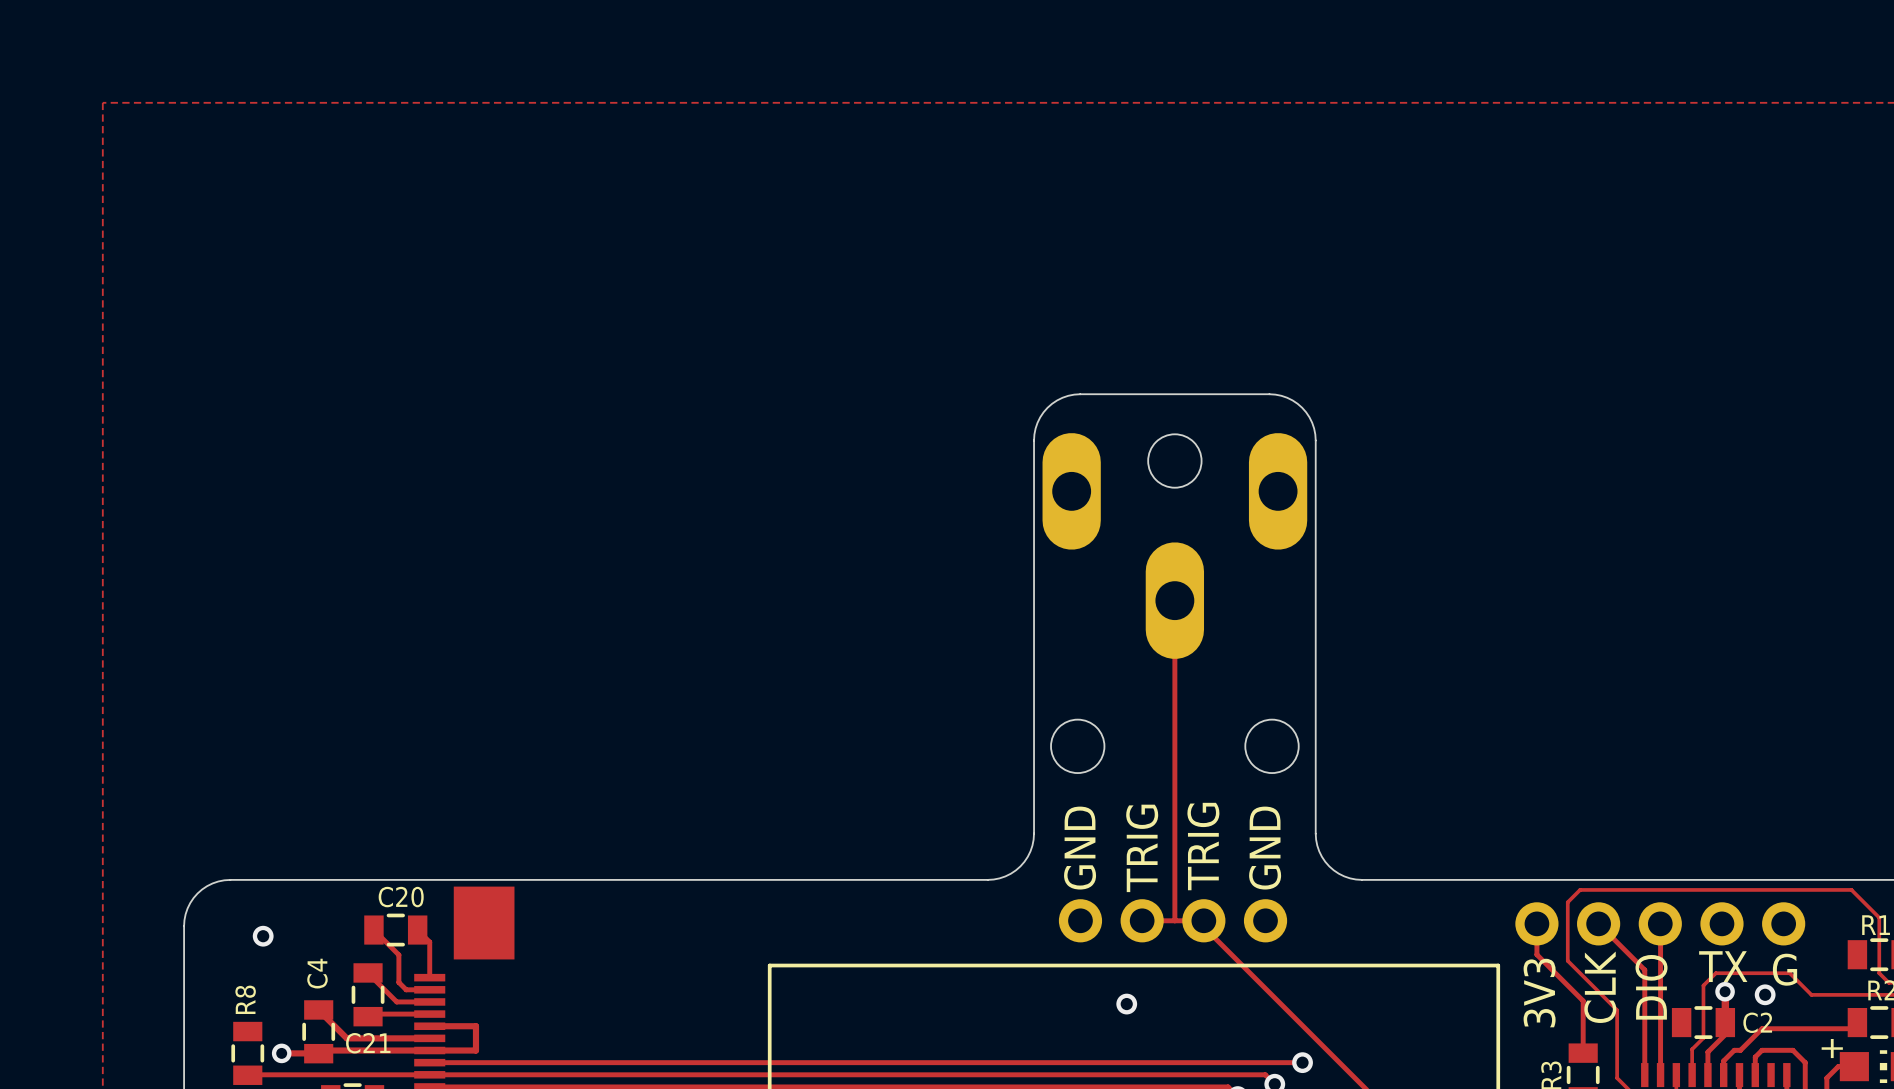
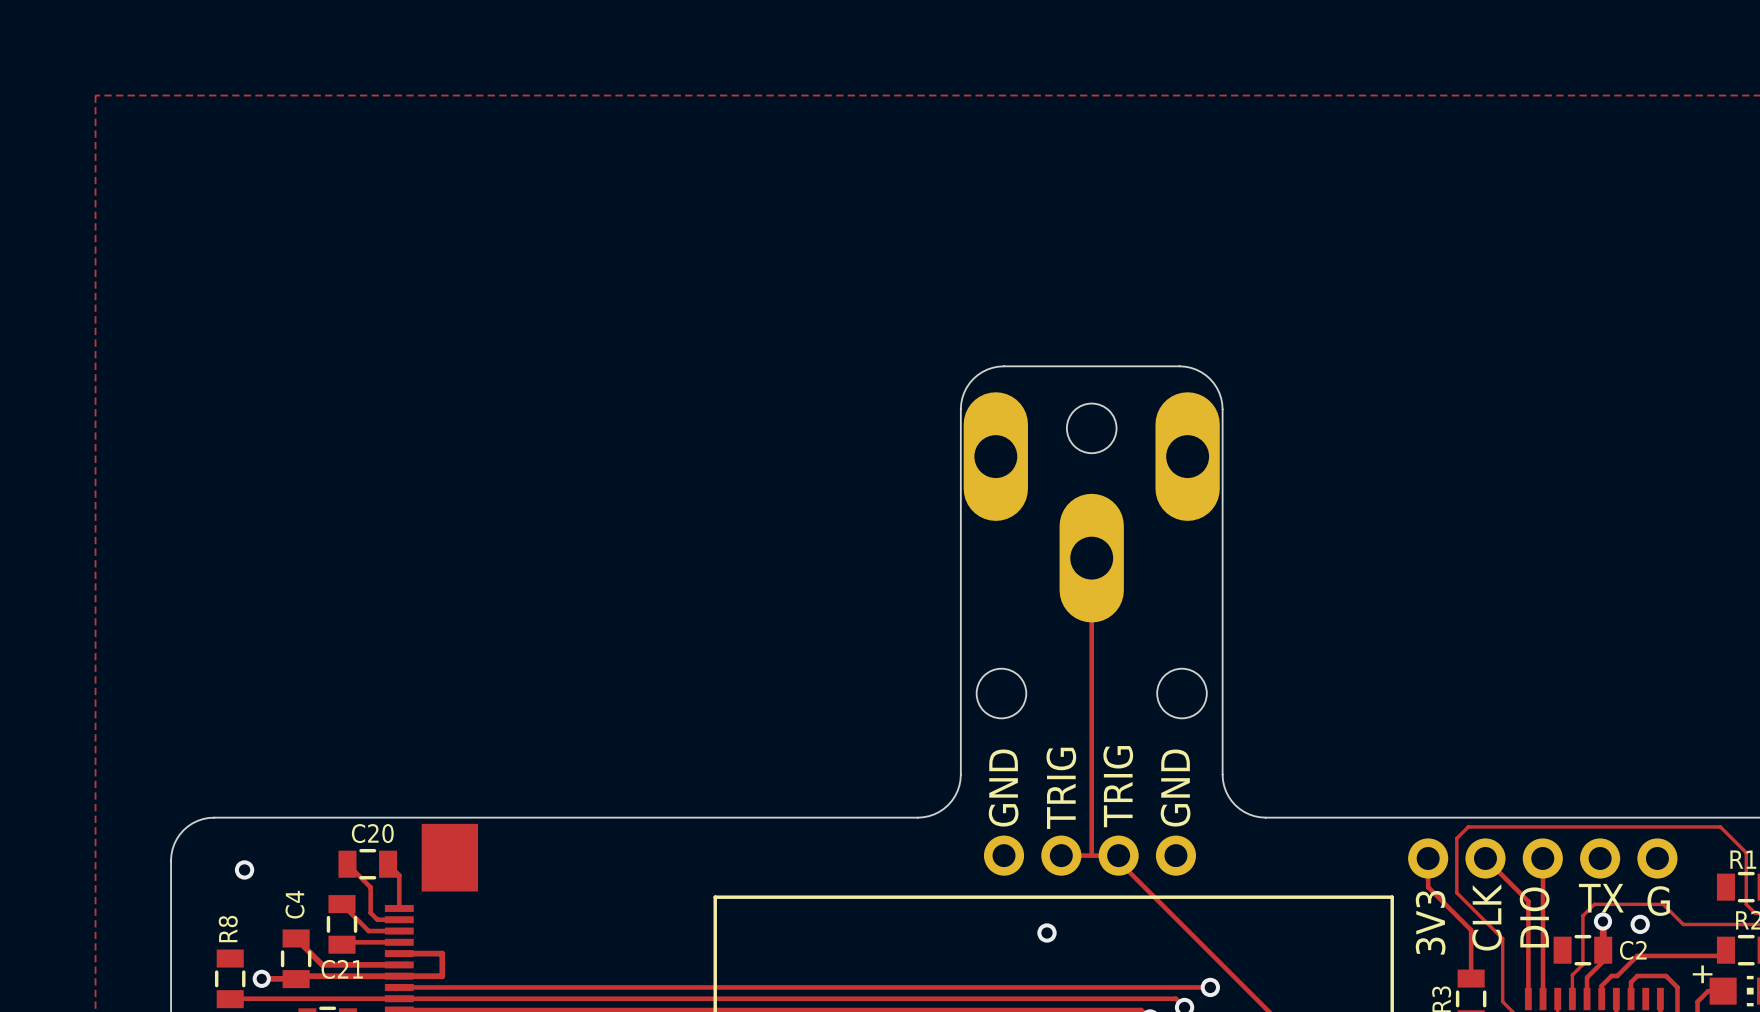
part footprint: [1042, 433, 1101, 550] -> [963, 392, 1028, 521]
part footprint: [1248, 433, 1308, 550] -> [1155, 392, 1220, 521]
part footprint: [1145, 542, 1205, 659] -> [1059, 493, 1124, 623]

